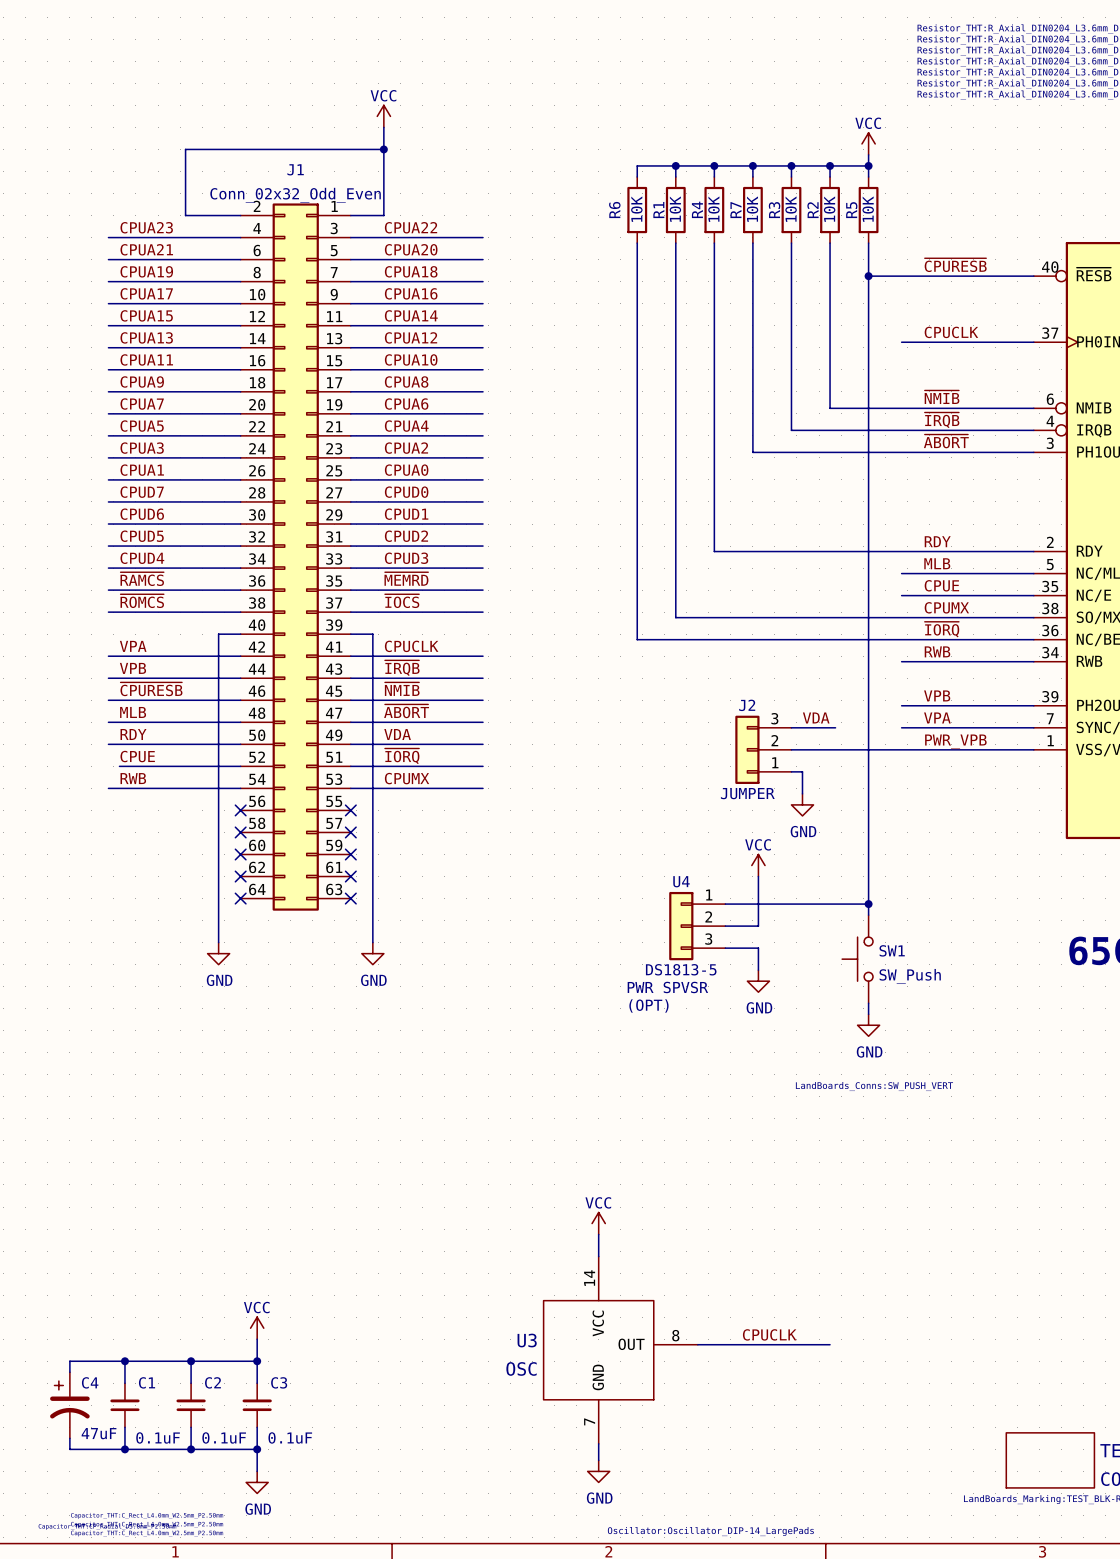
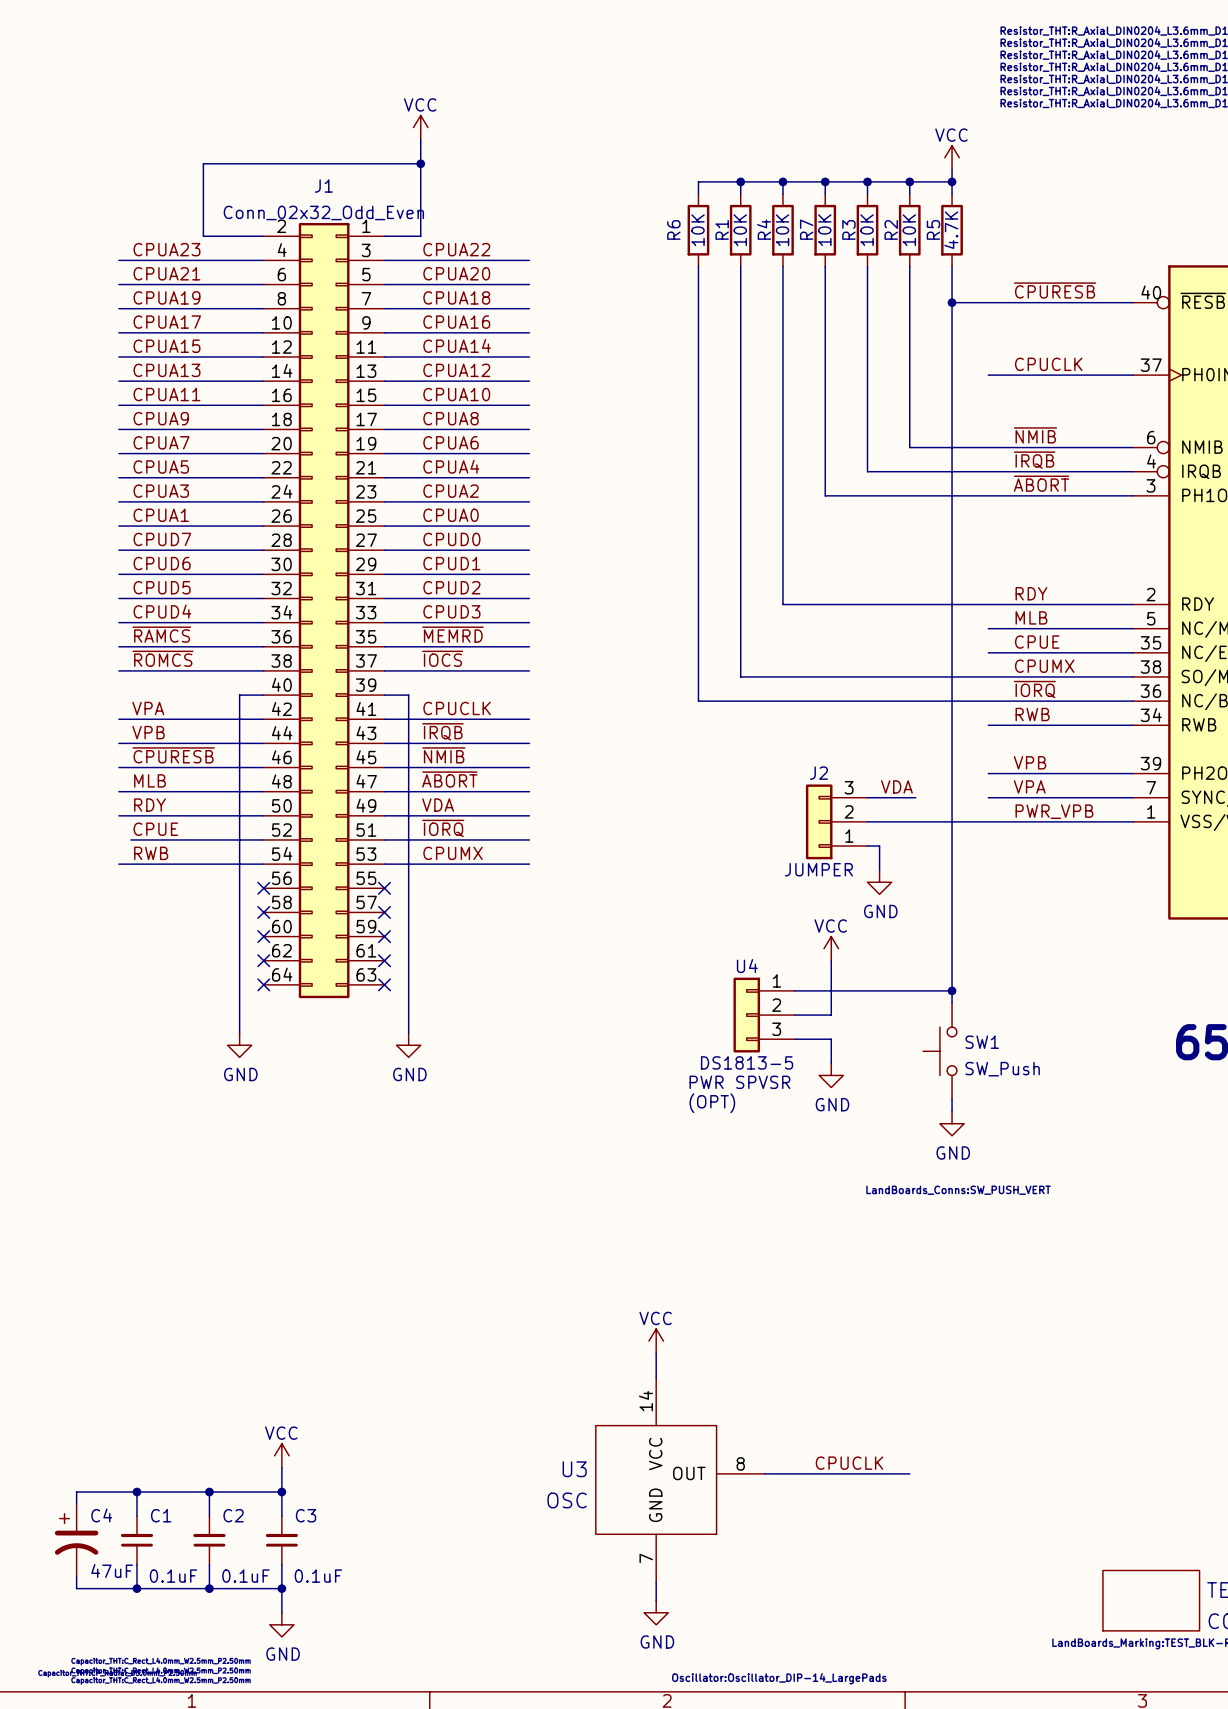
R5 value: 10K (868, 209) -> 4.7K (951, 230)

